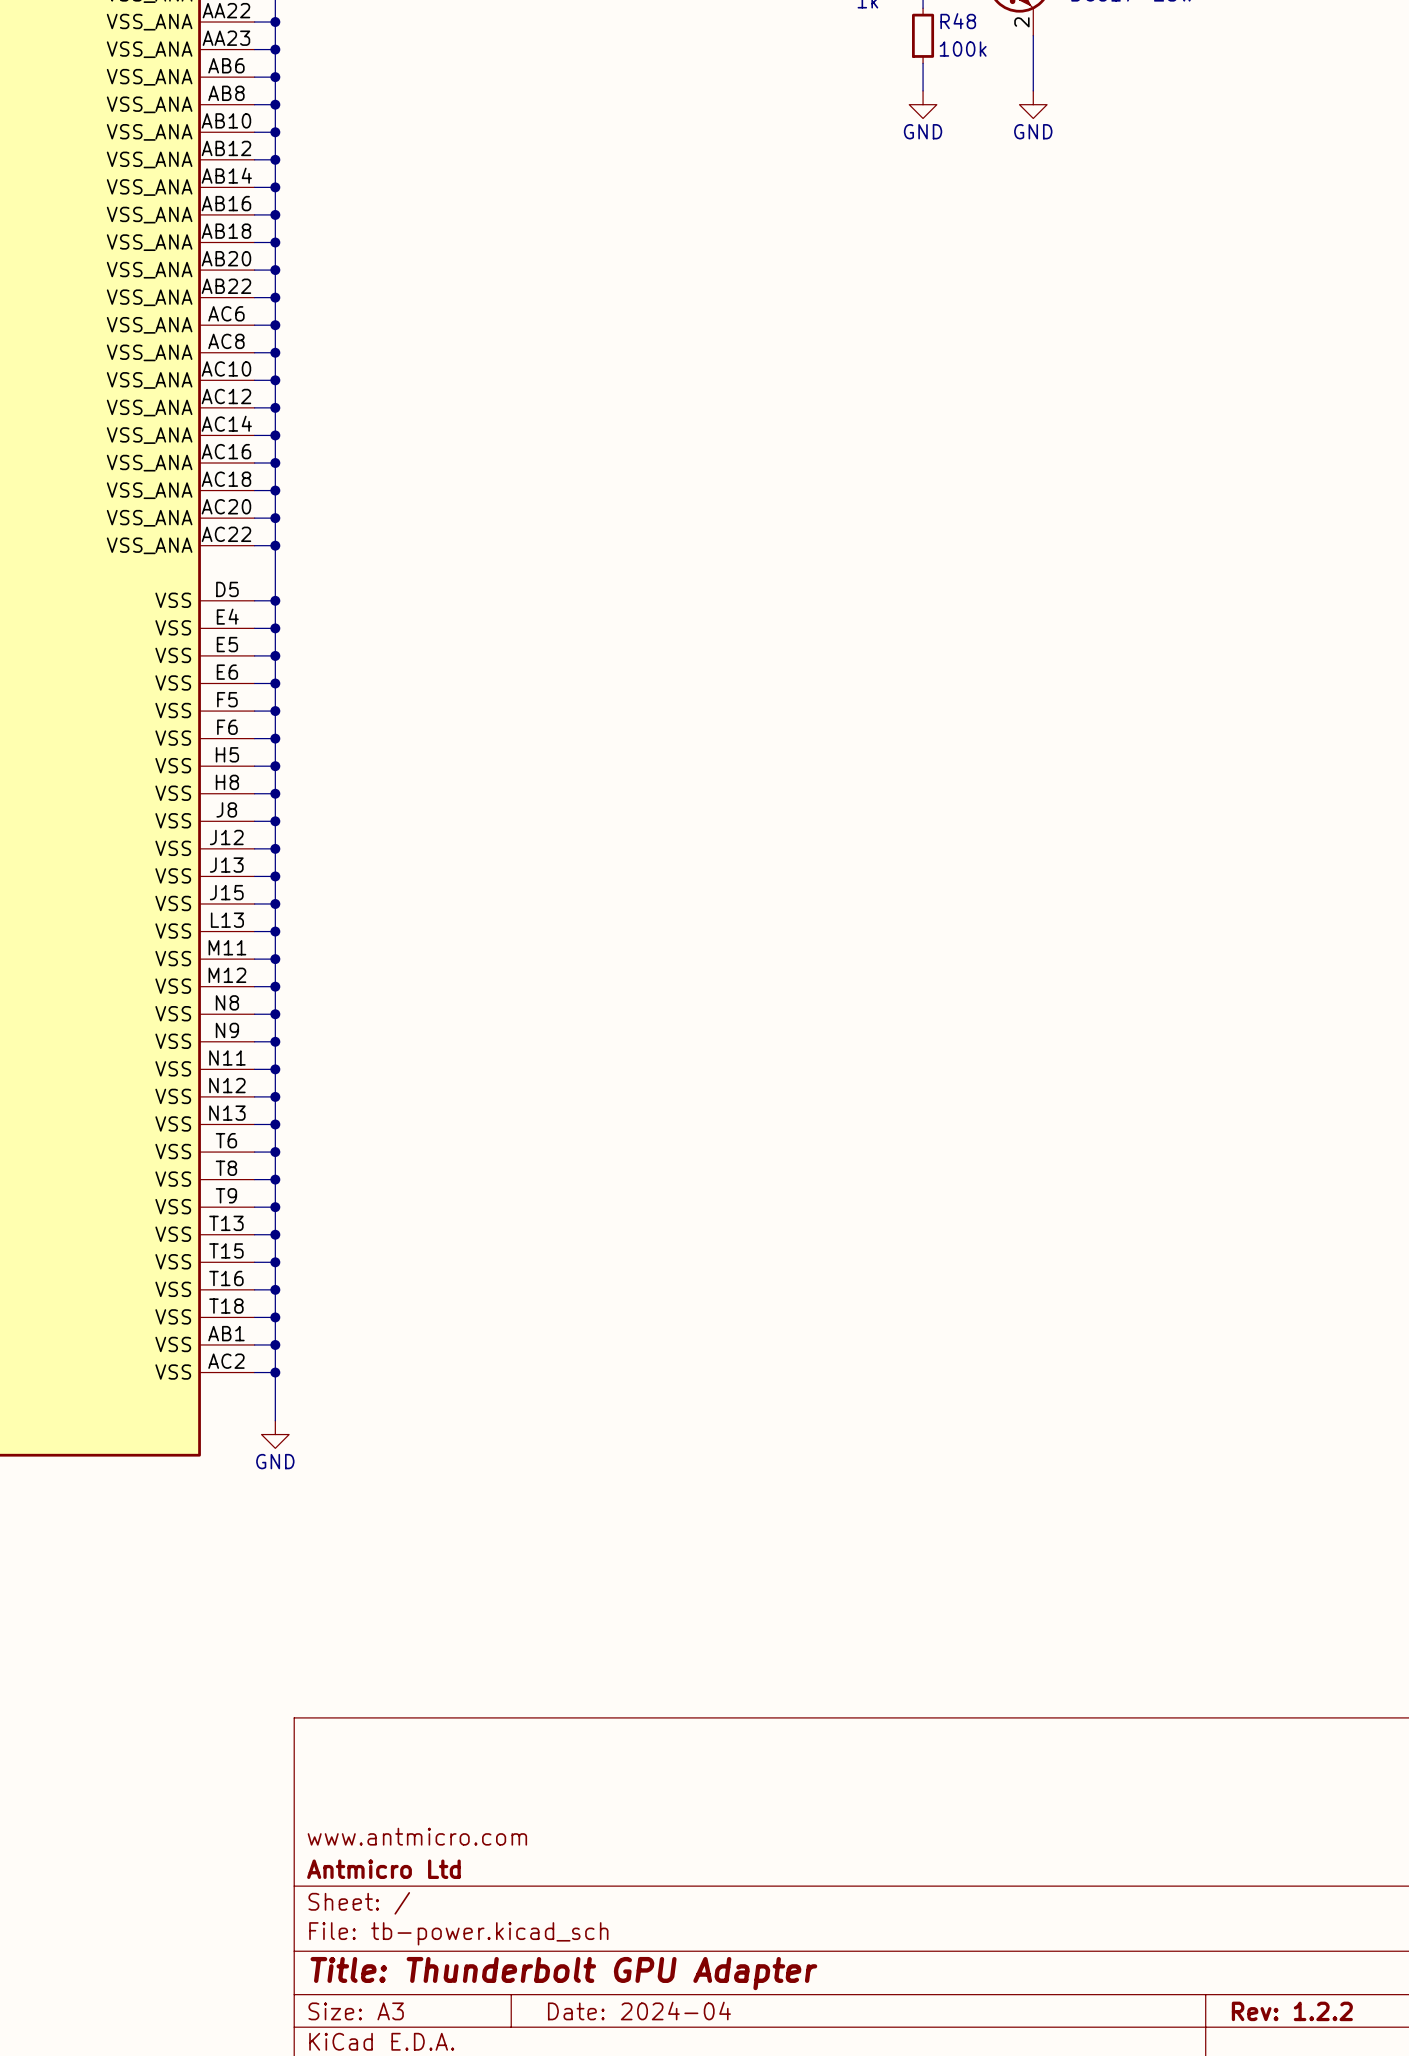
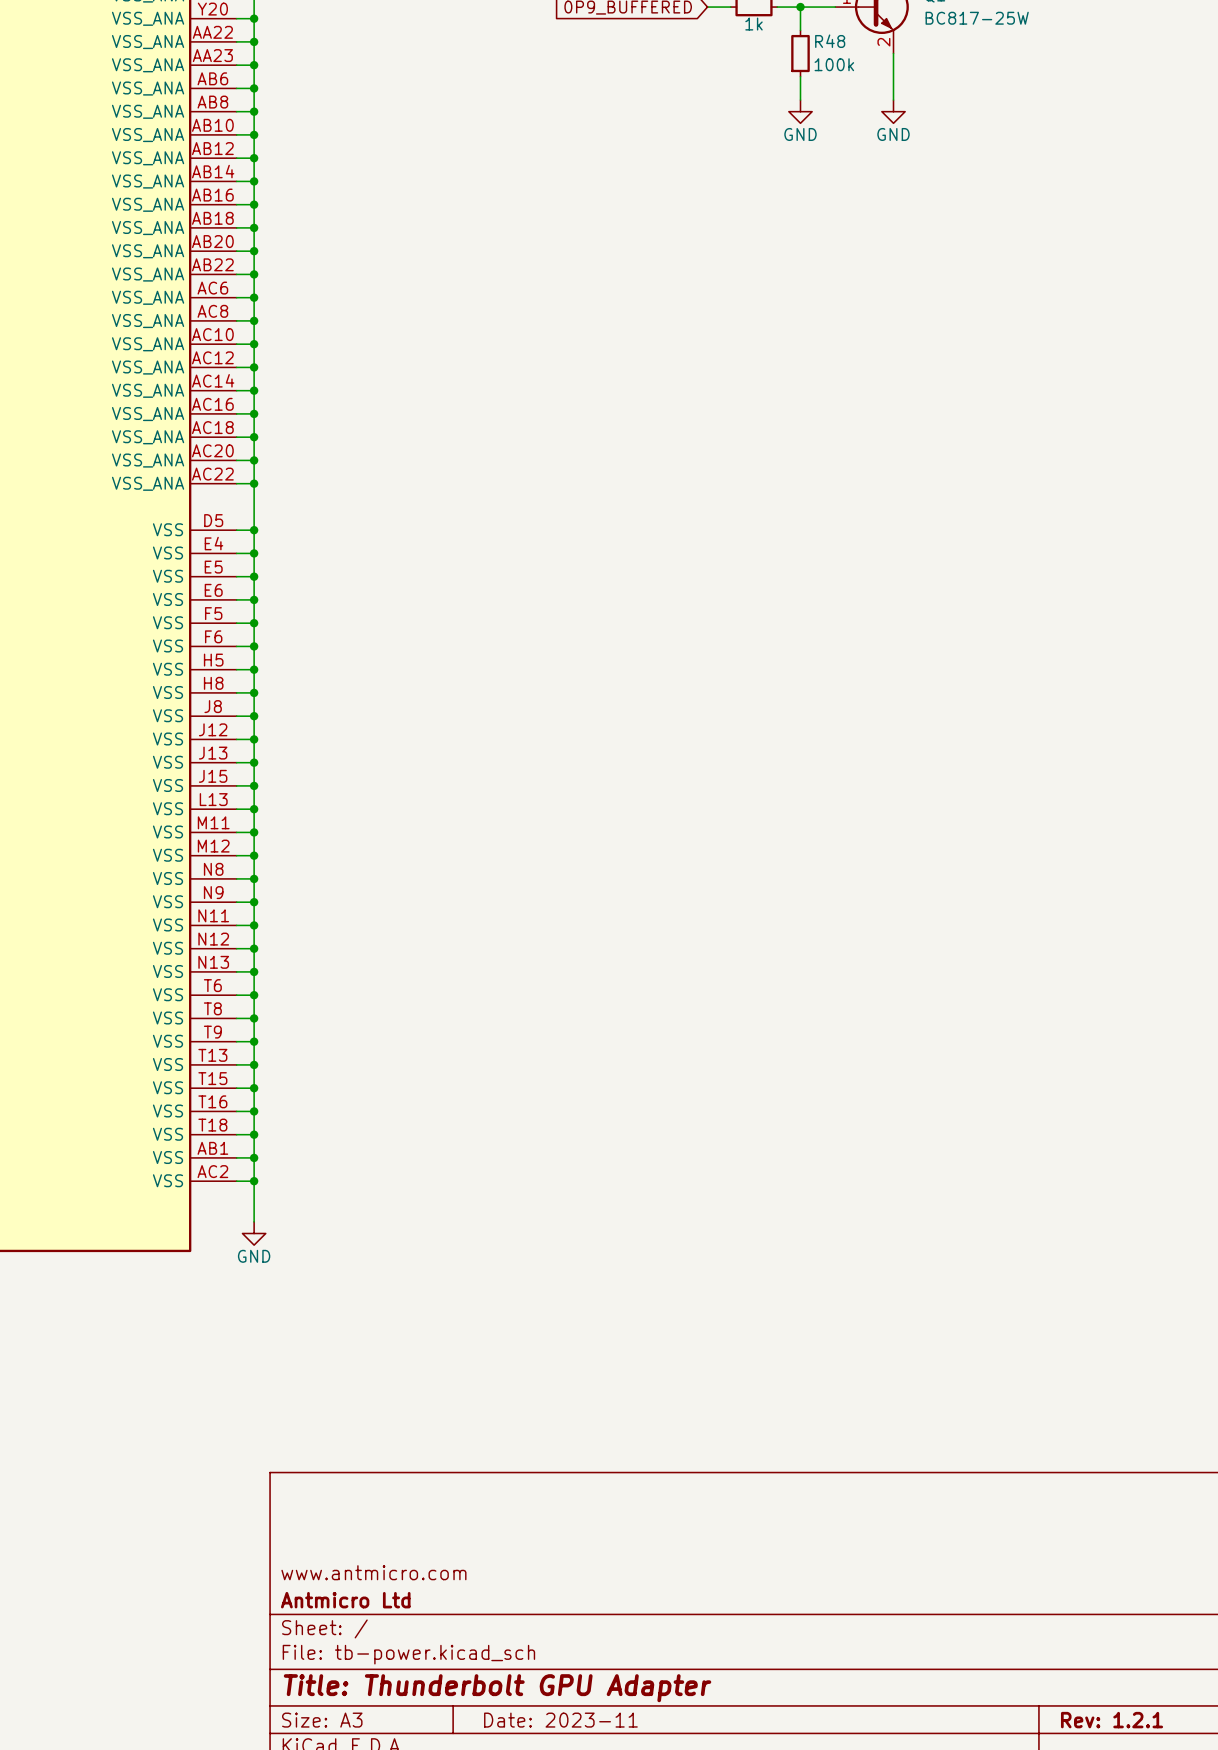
title block: Date: 2024-04 (639, 2011) -> Date: 2023-11 (560, 1720)
title block: Rev: 1.2.2 (1292, 2011) -> Rev: 1.2.1 (1112, 1720)

